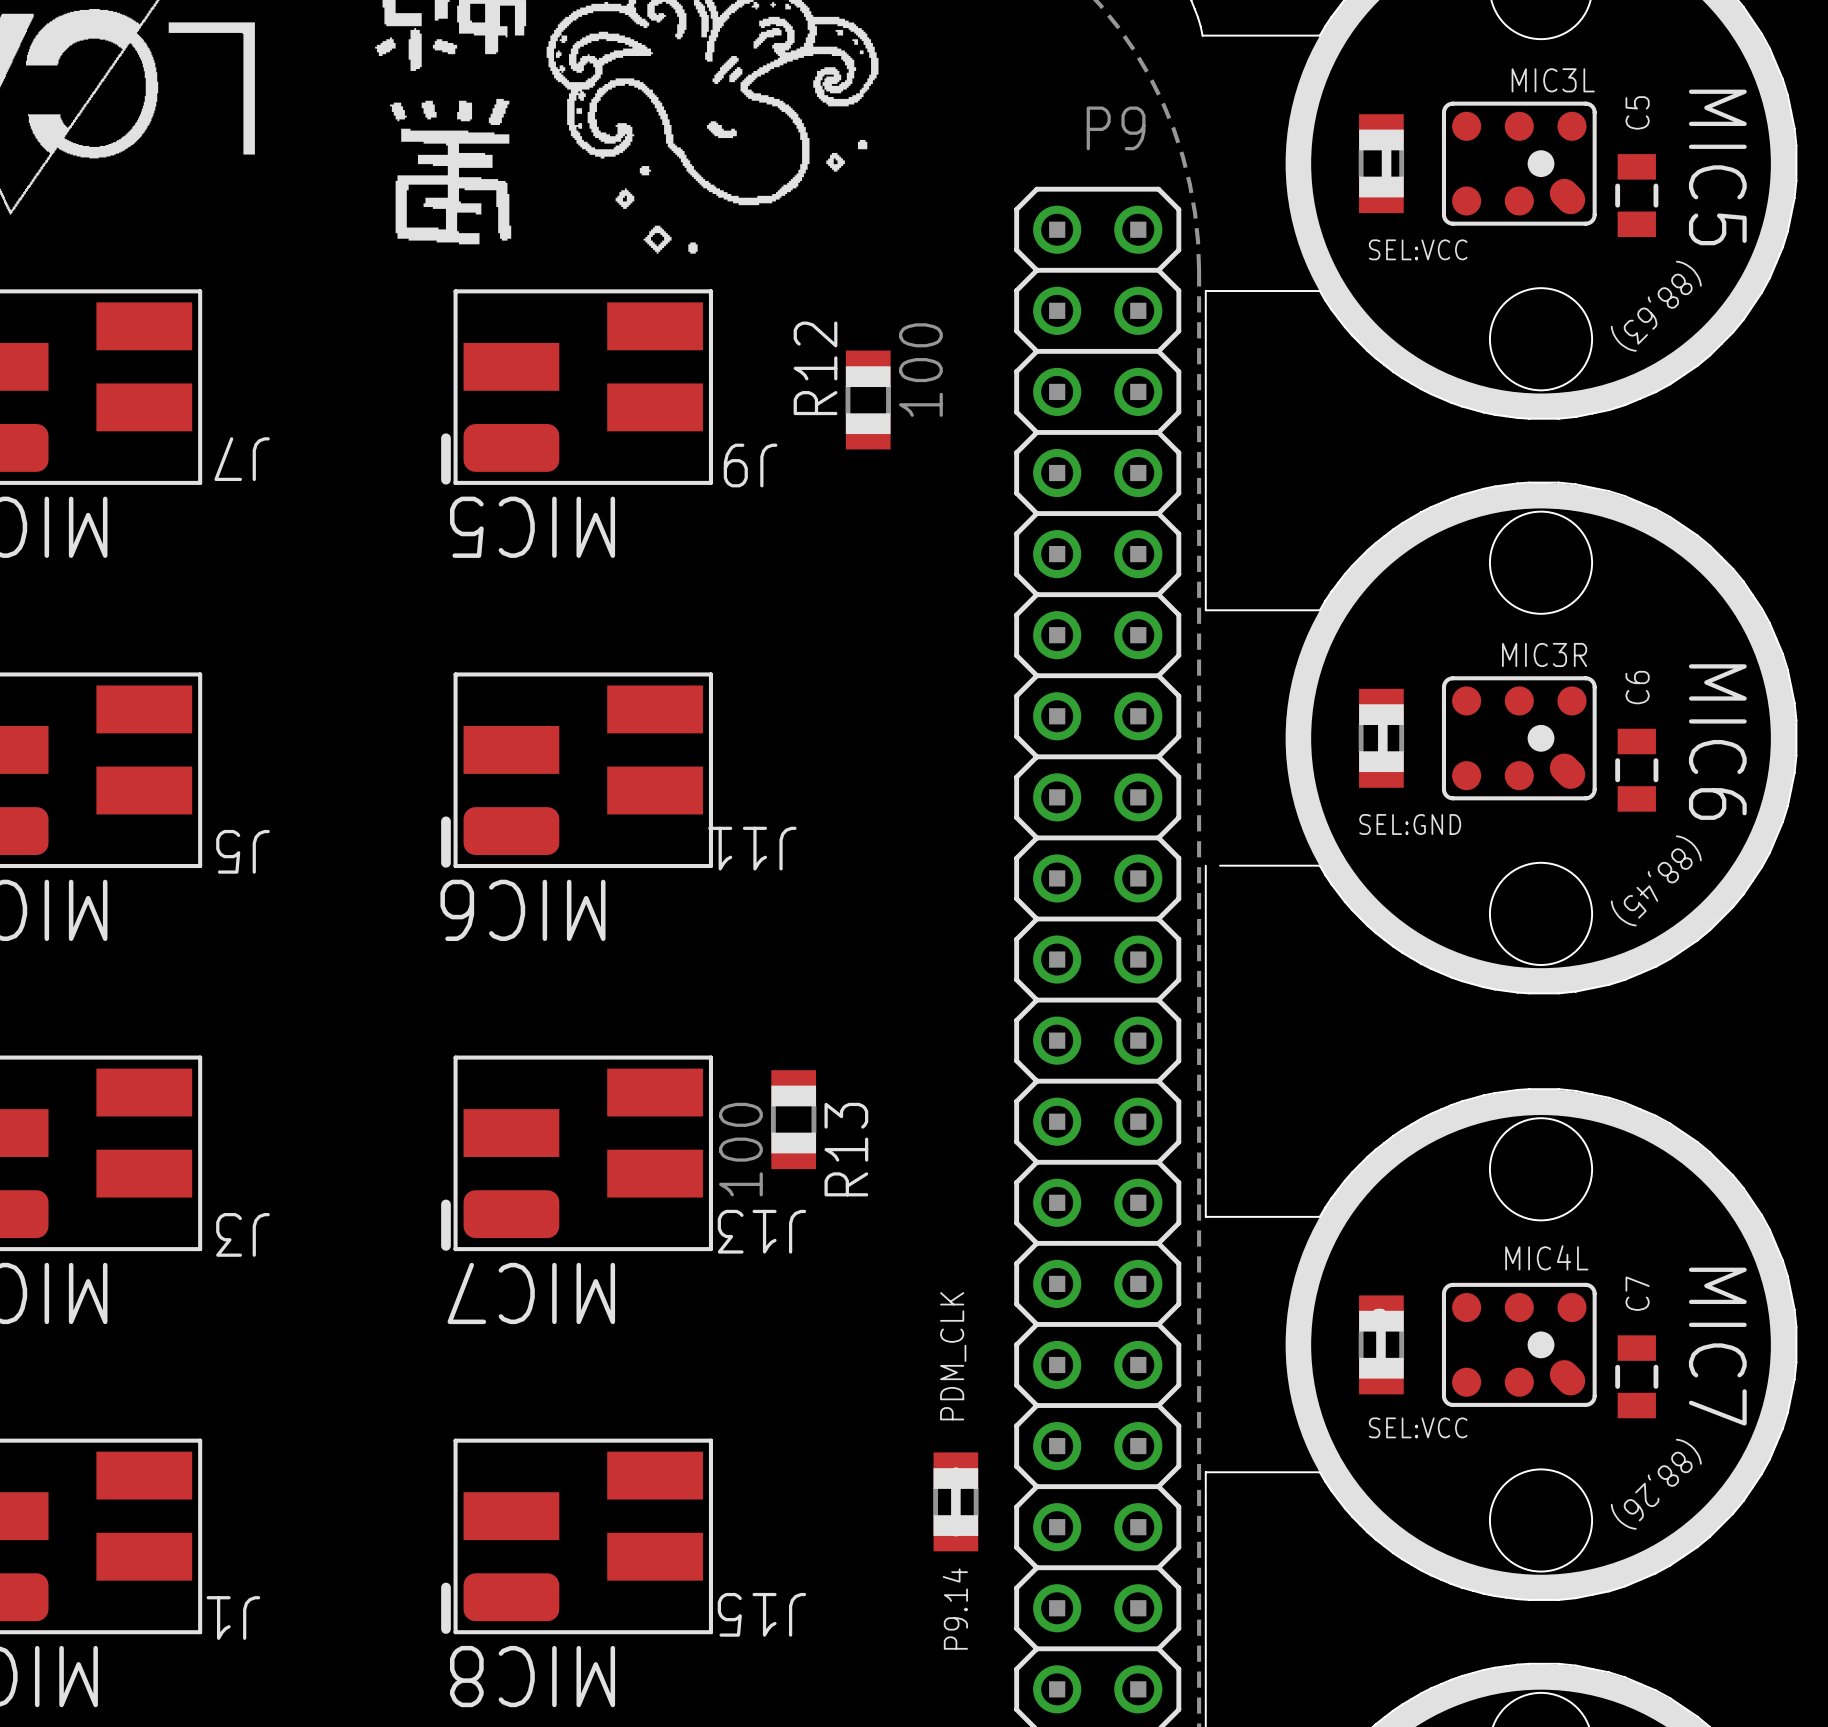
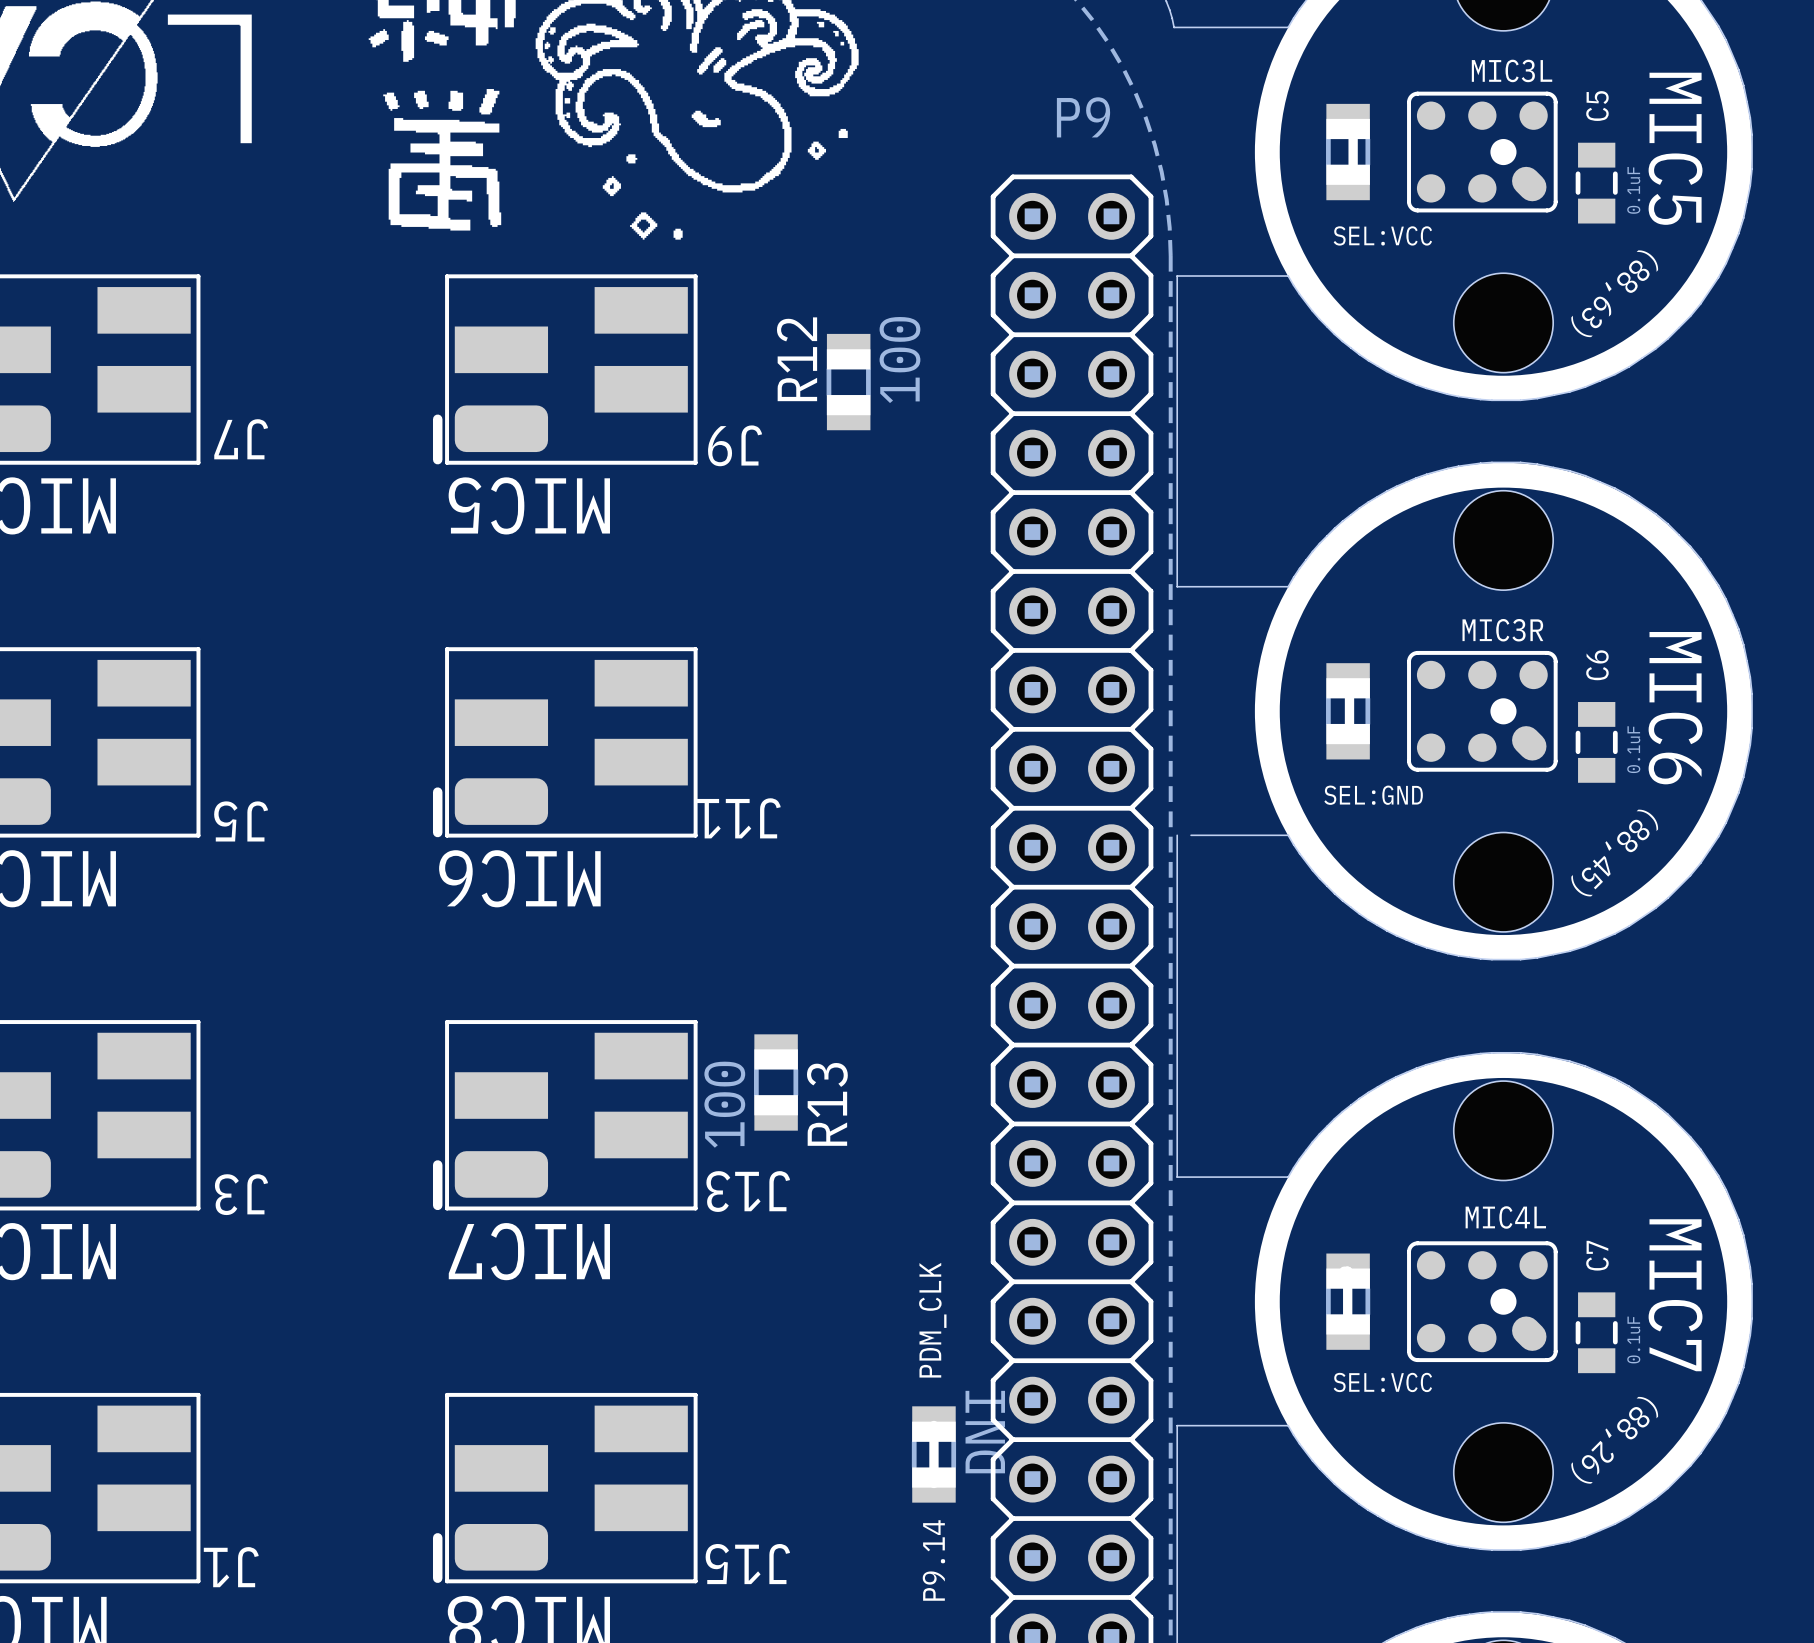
C5 value: none -> 0.1uF (1633, 190)
C6 value: none -> 0.1uF (1633, 749)
C7 value: none -> 0.1uF (1633, 1340)
part value: none -> DNI (985, 1432)

